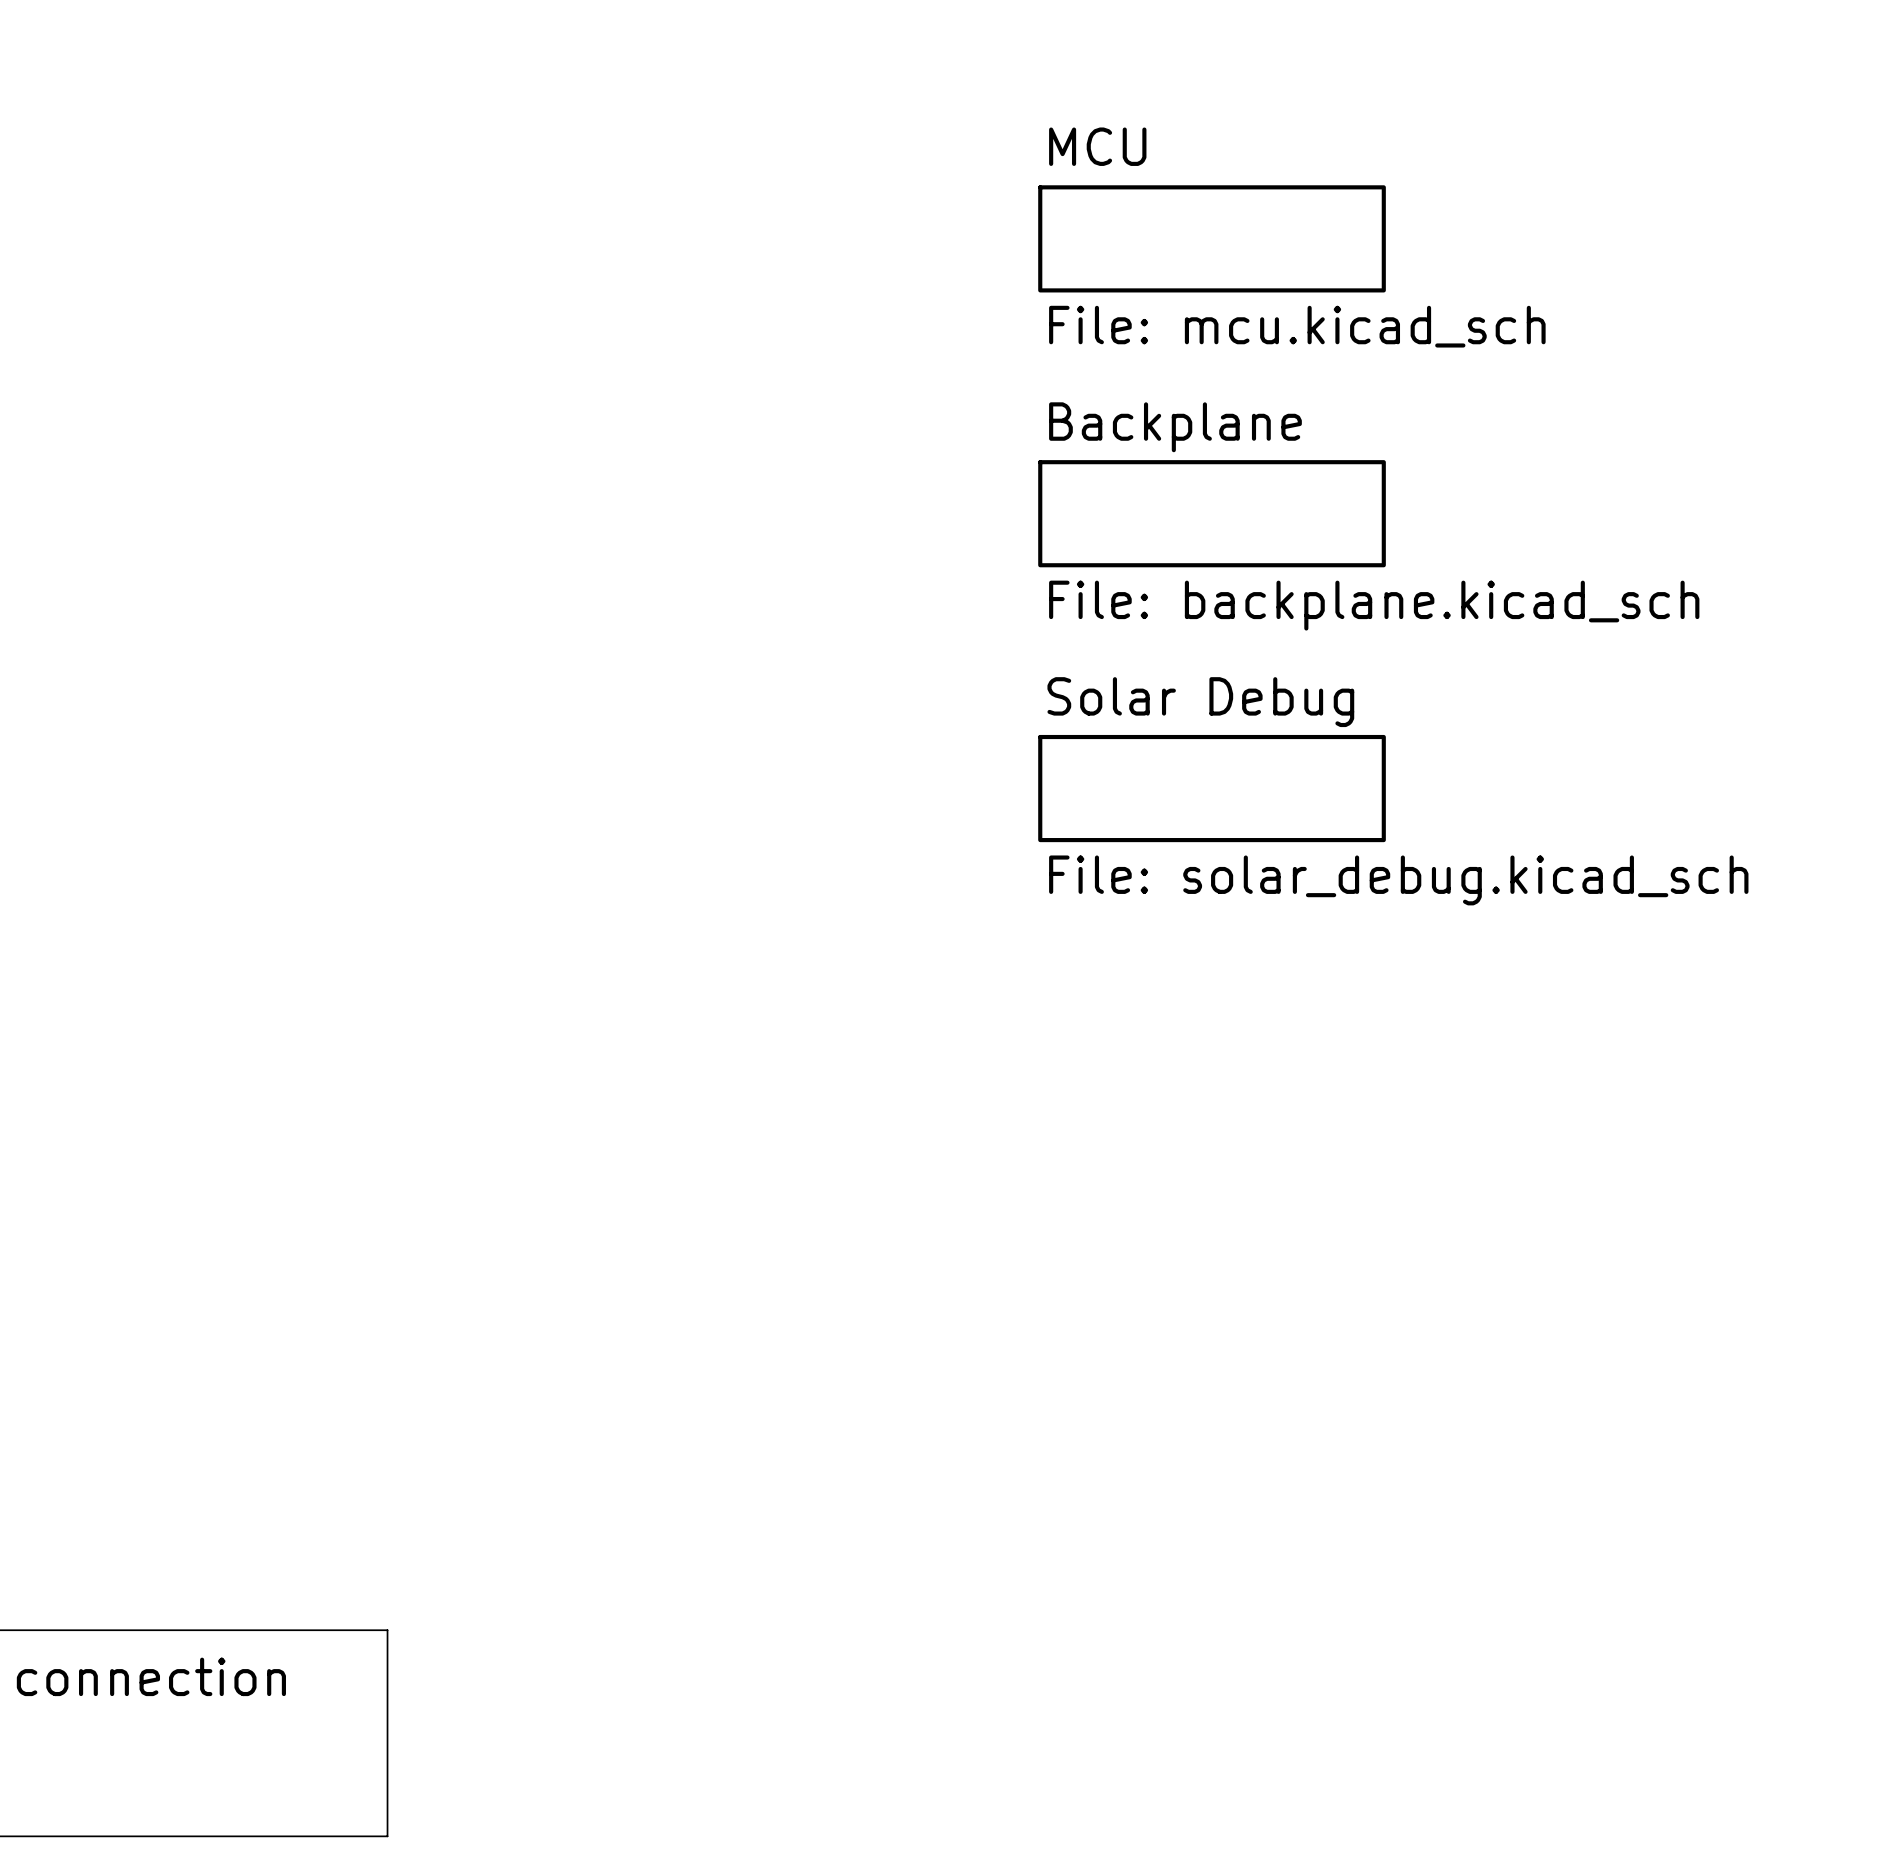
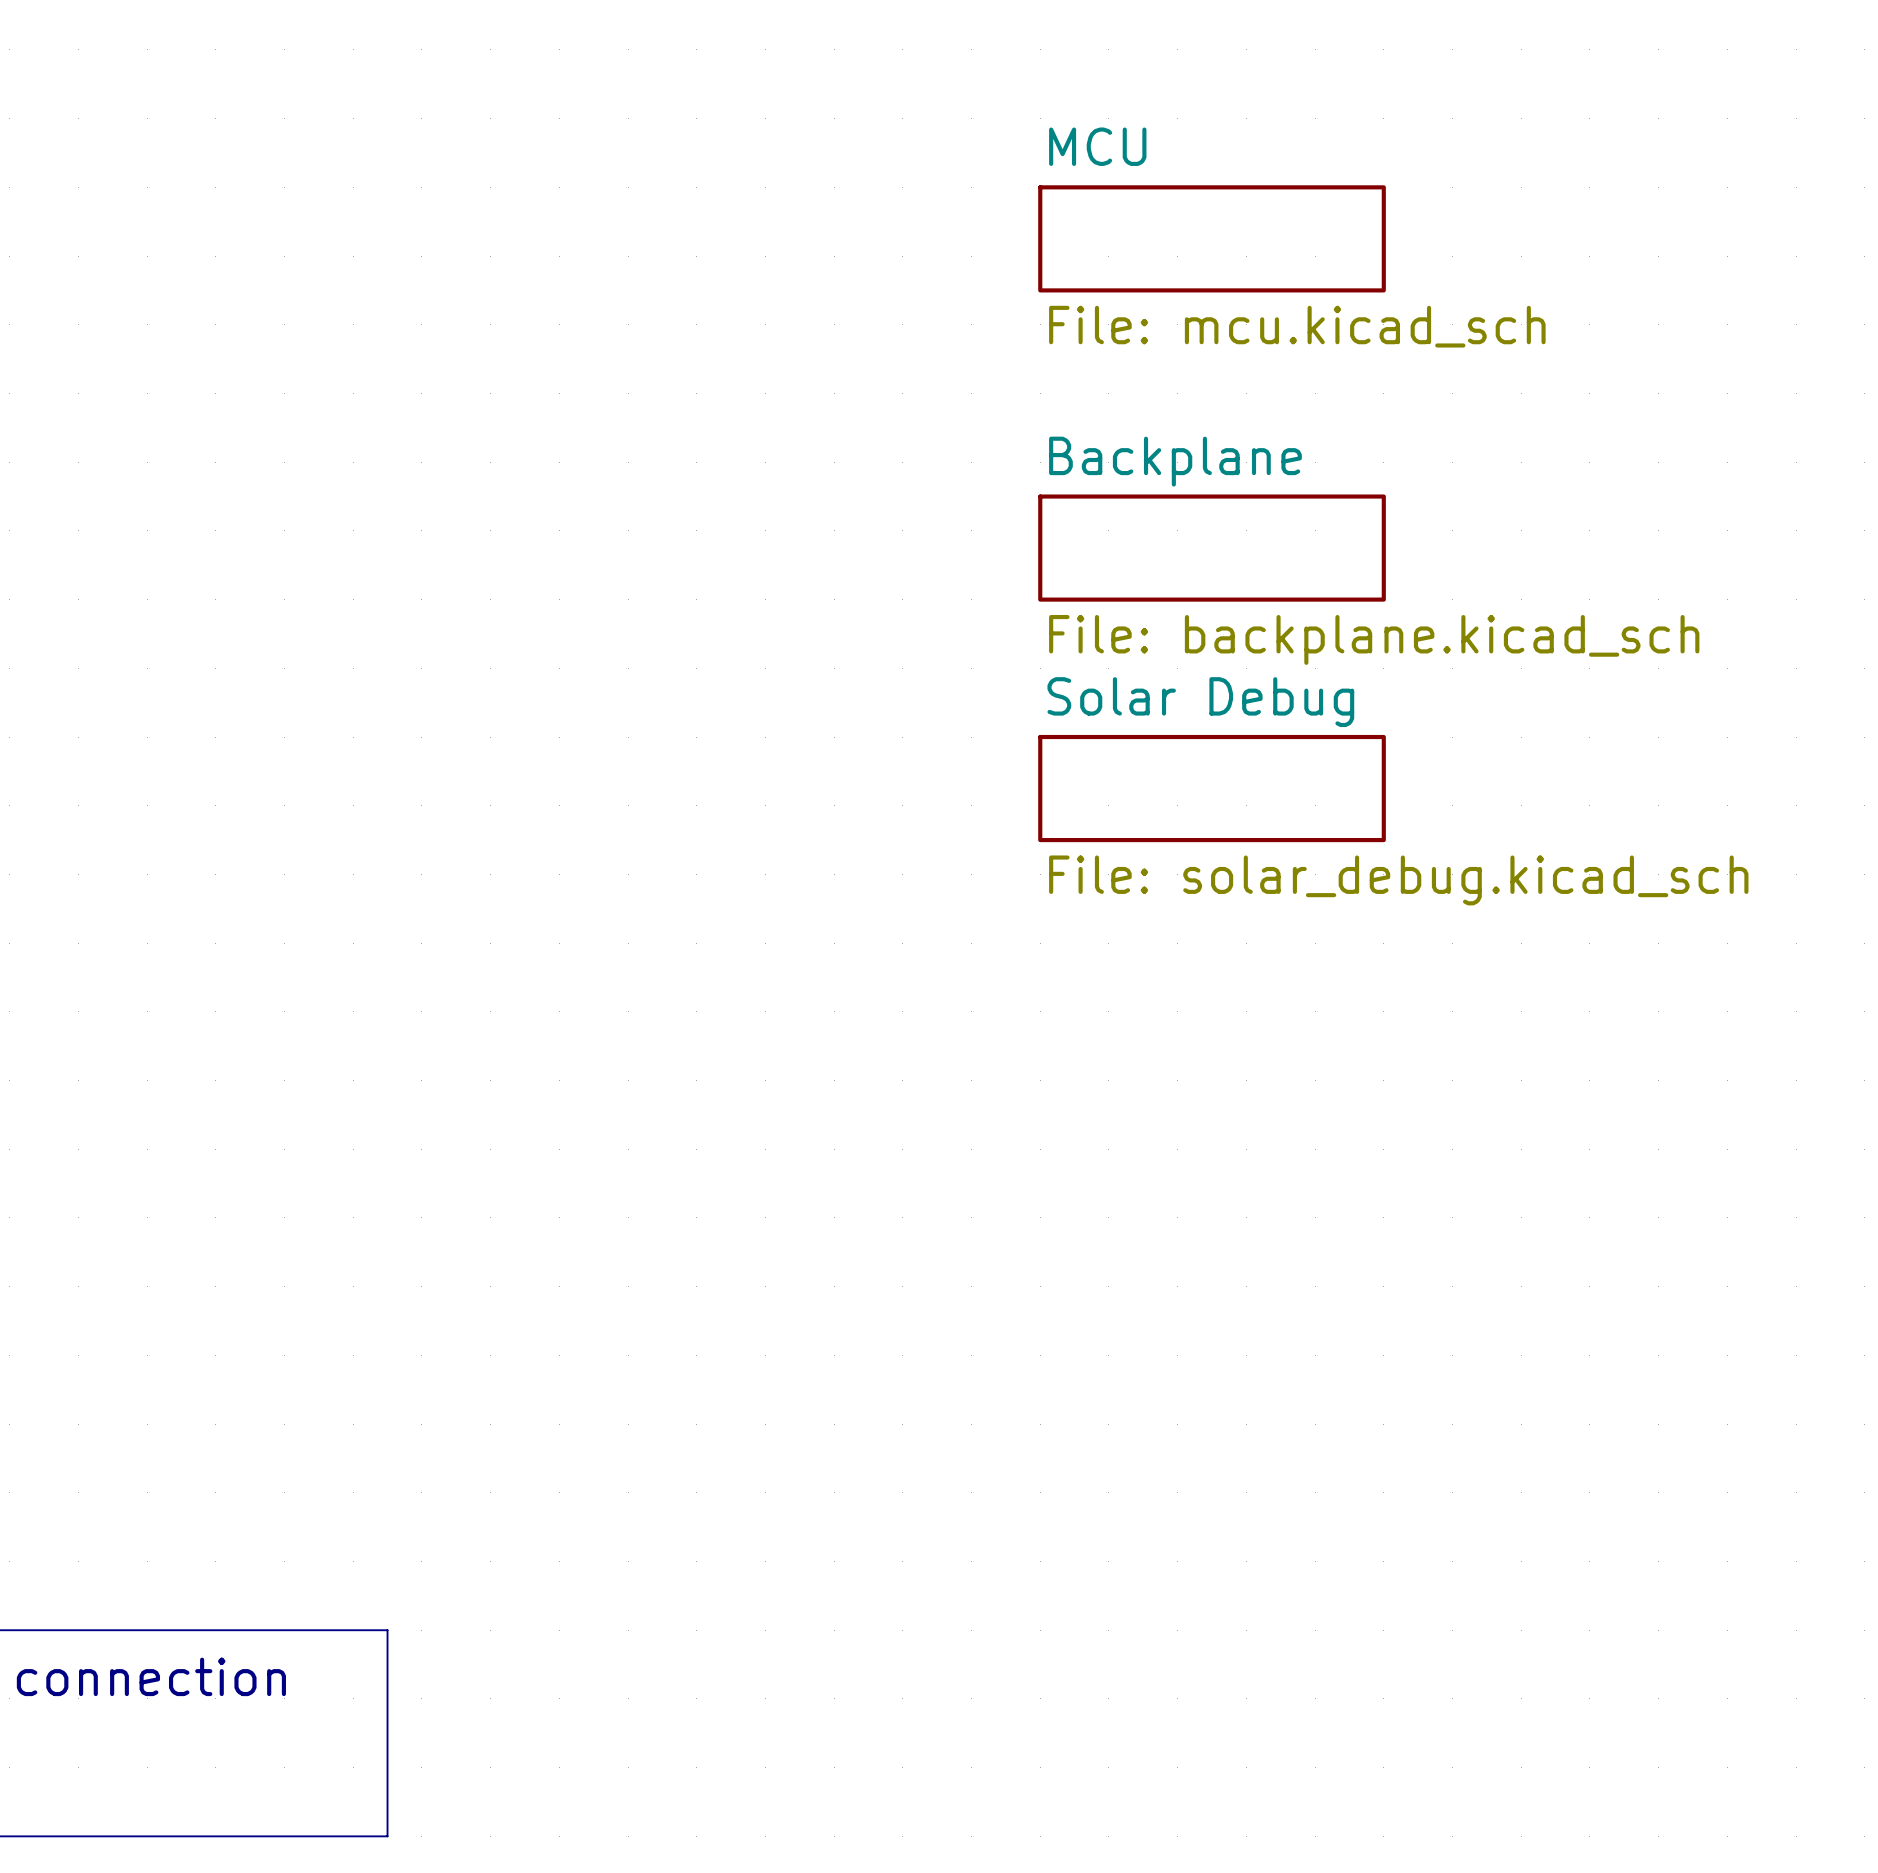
sheet Backplane position: (1212, 513) -> (1212, 548)

